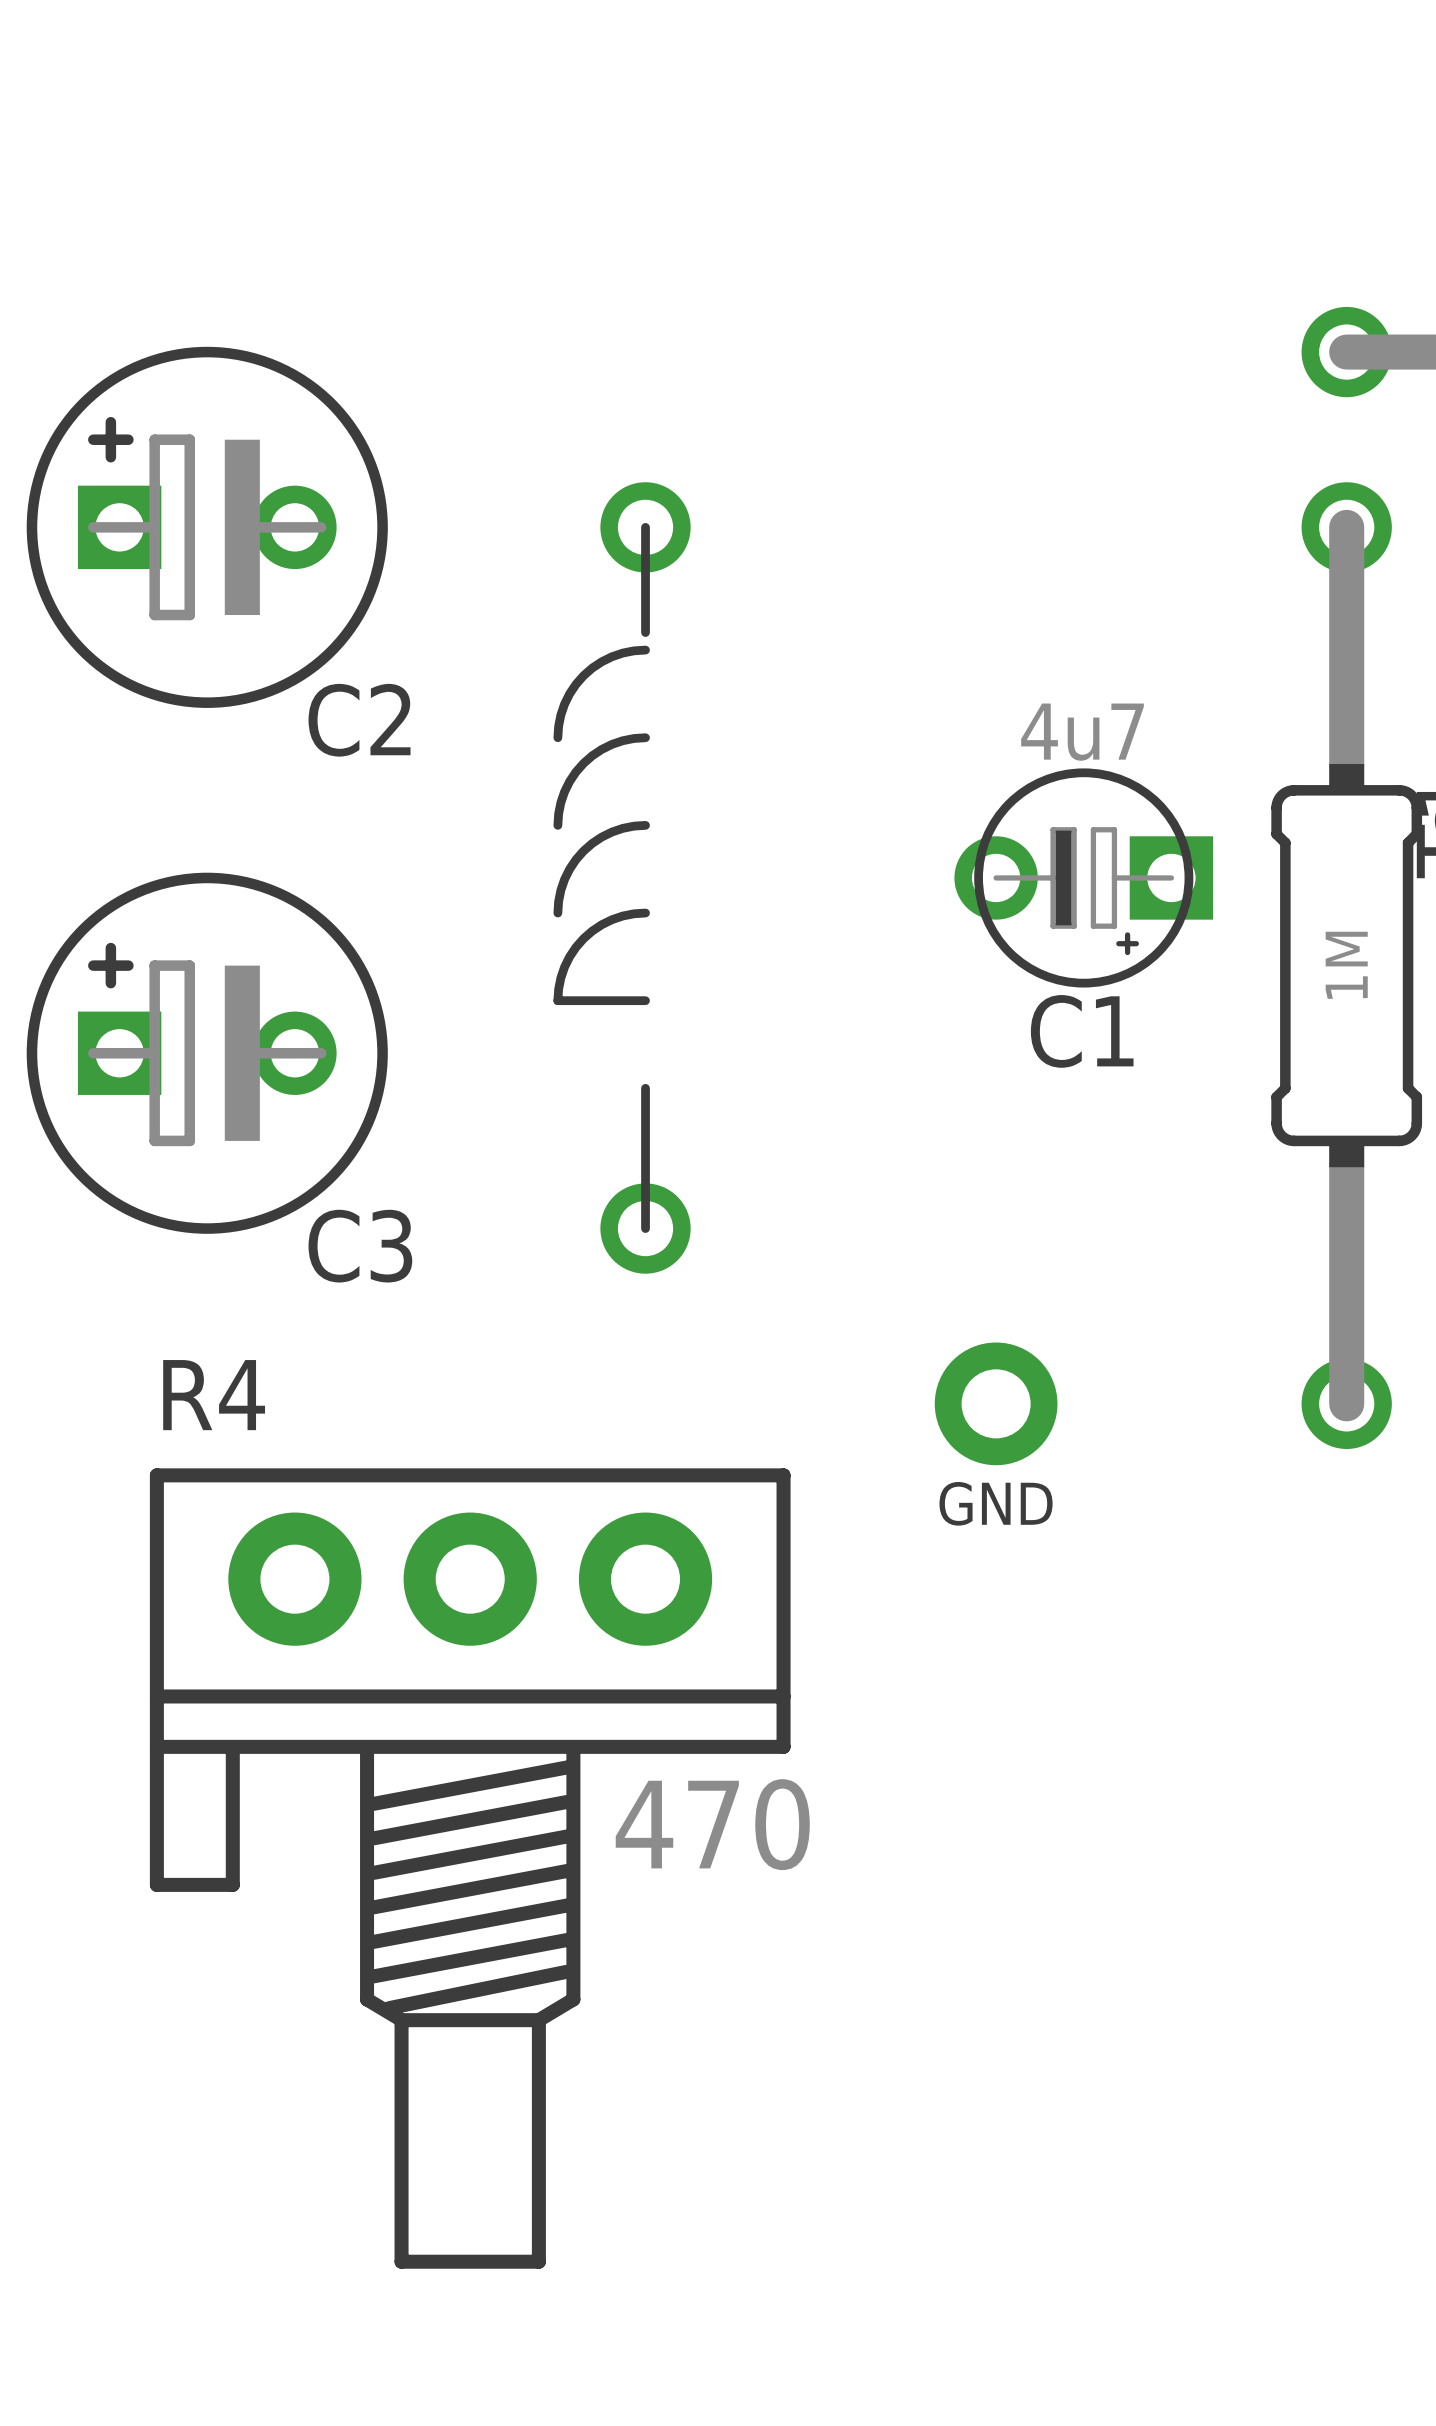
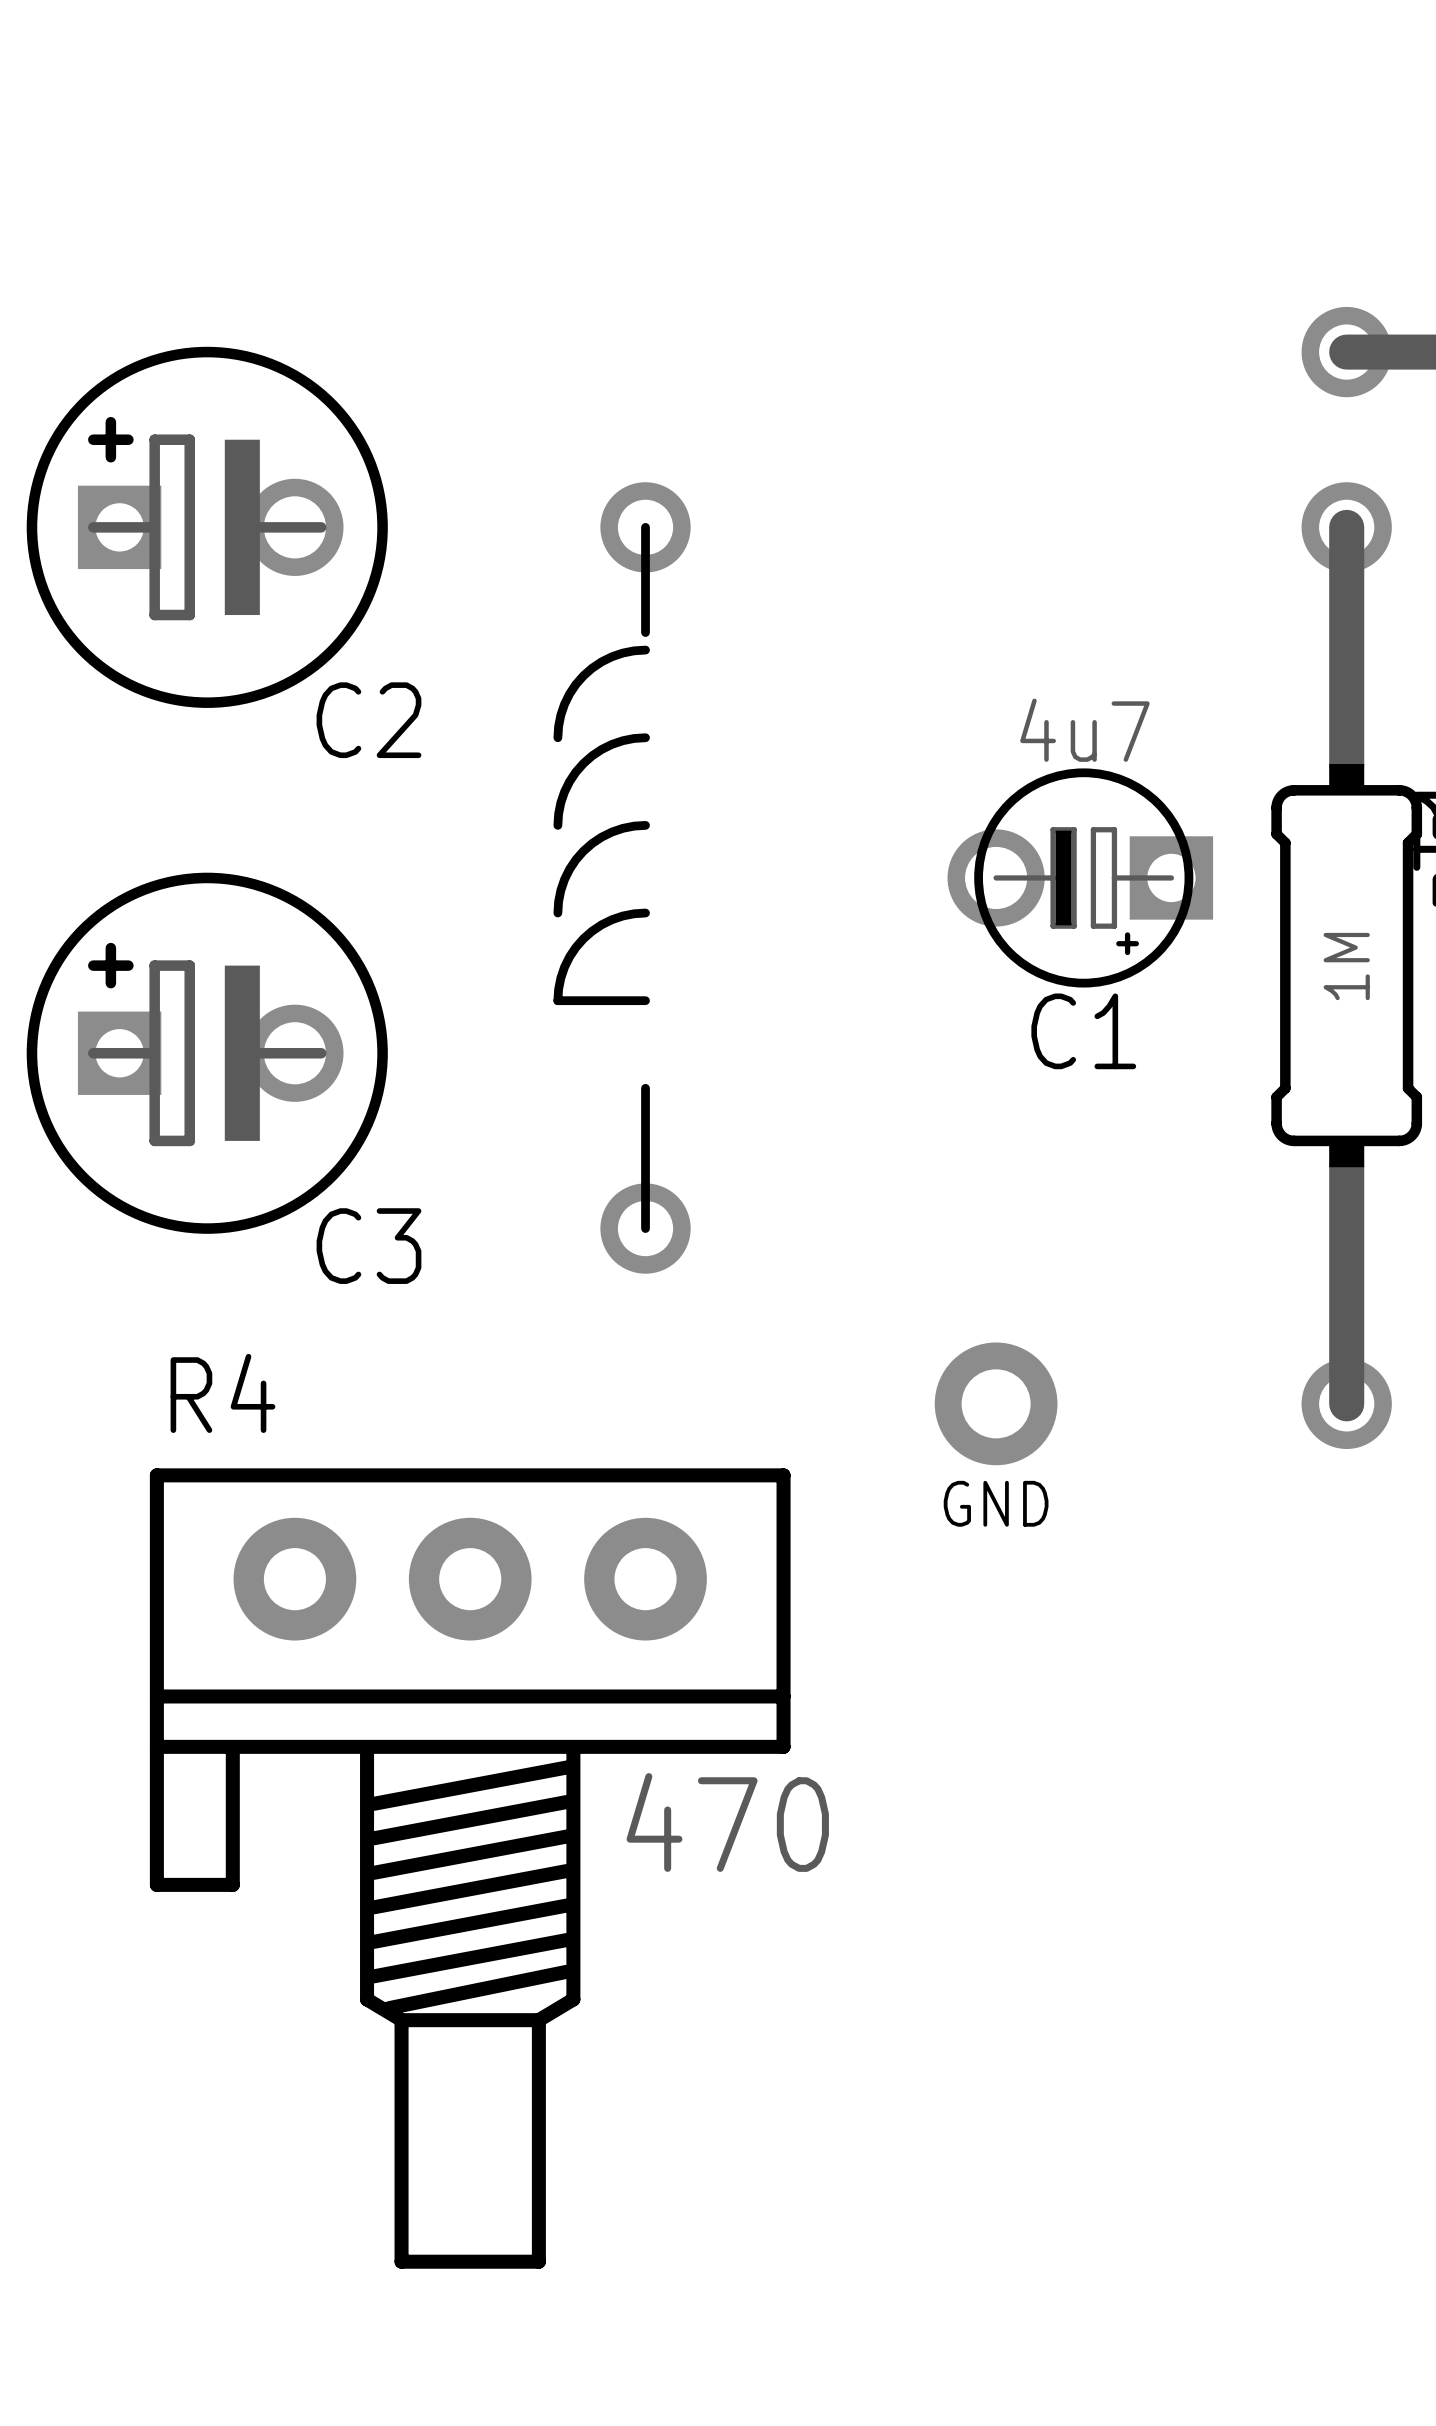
C2 footprint: [26, 346, 388, 708] -> [26, 346, 388, 708]
C1 footprint: [954, 768, 1214, 988] -> [947, 768, 1214, 988]
C3 footprint: [26, 872, 388, 1234] -> [26, 872, 388, 1234]
R4 footprint: [149, 1468, 791, 2269] -> [149, 1468, 791, 2269]

